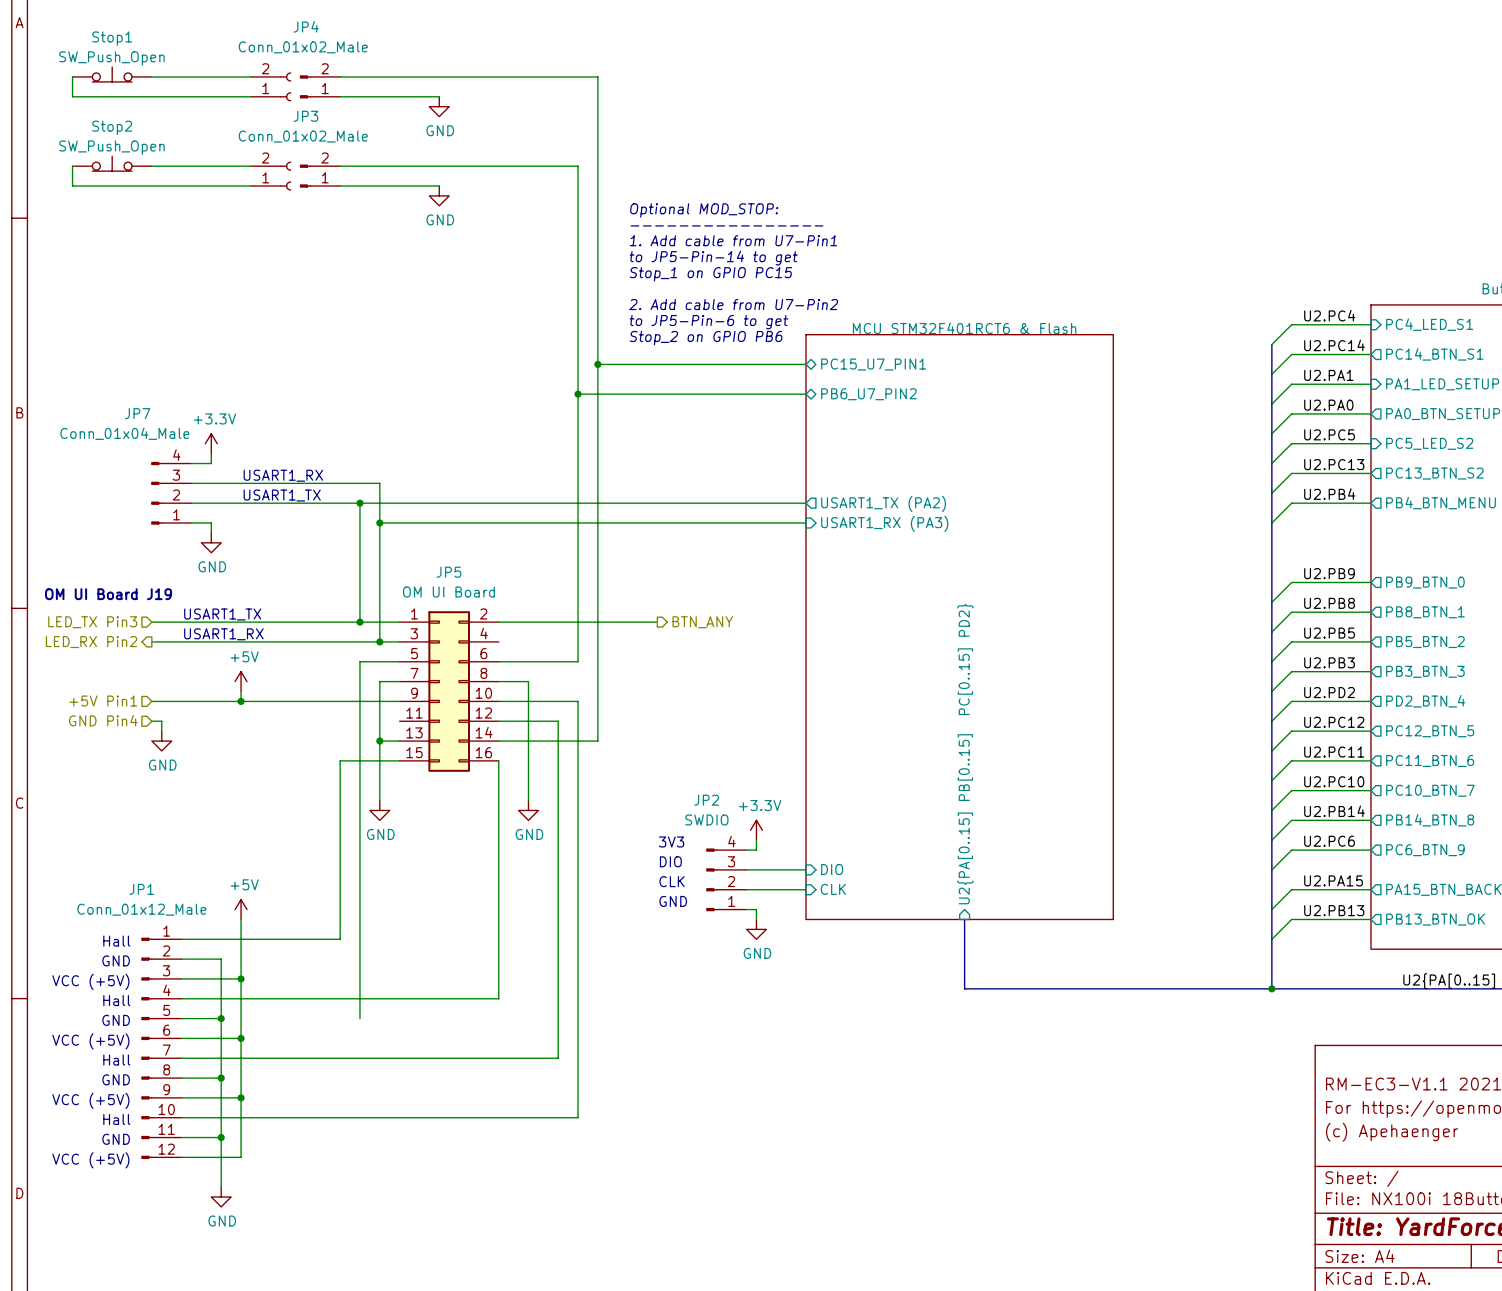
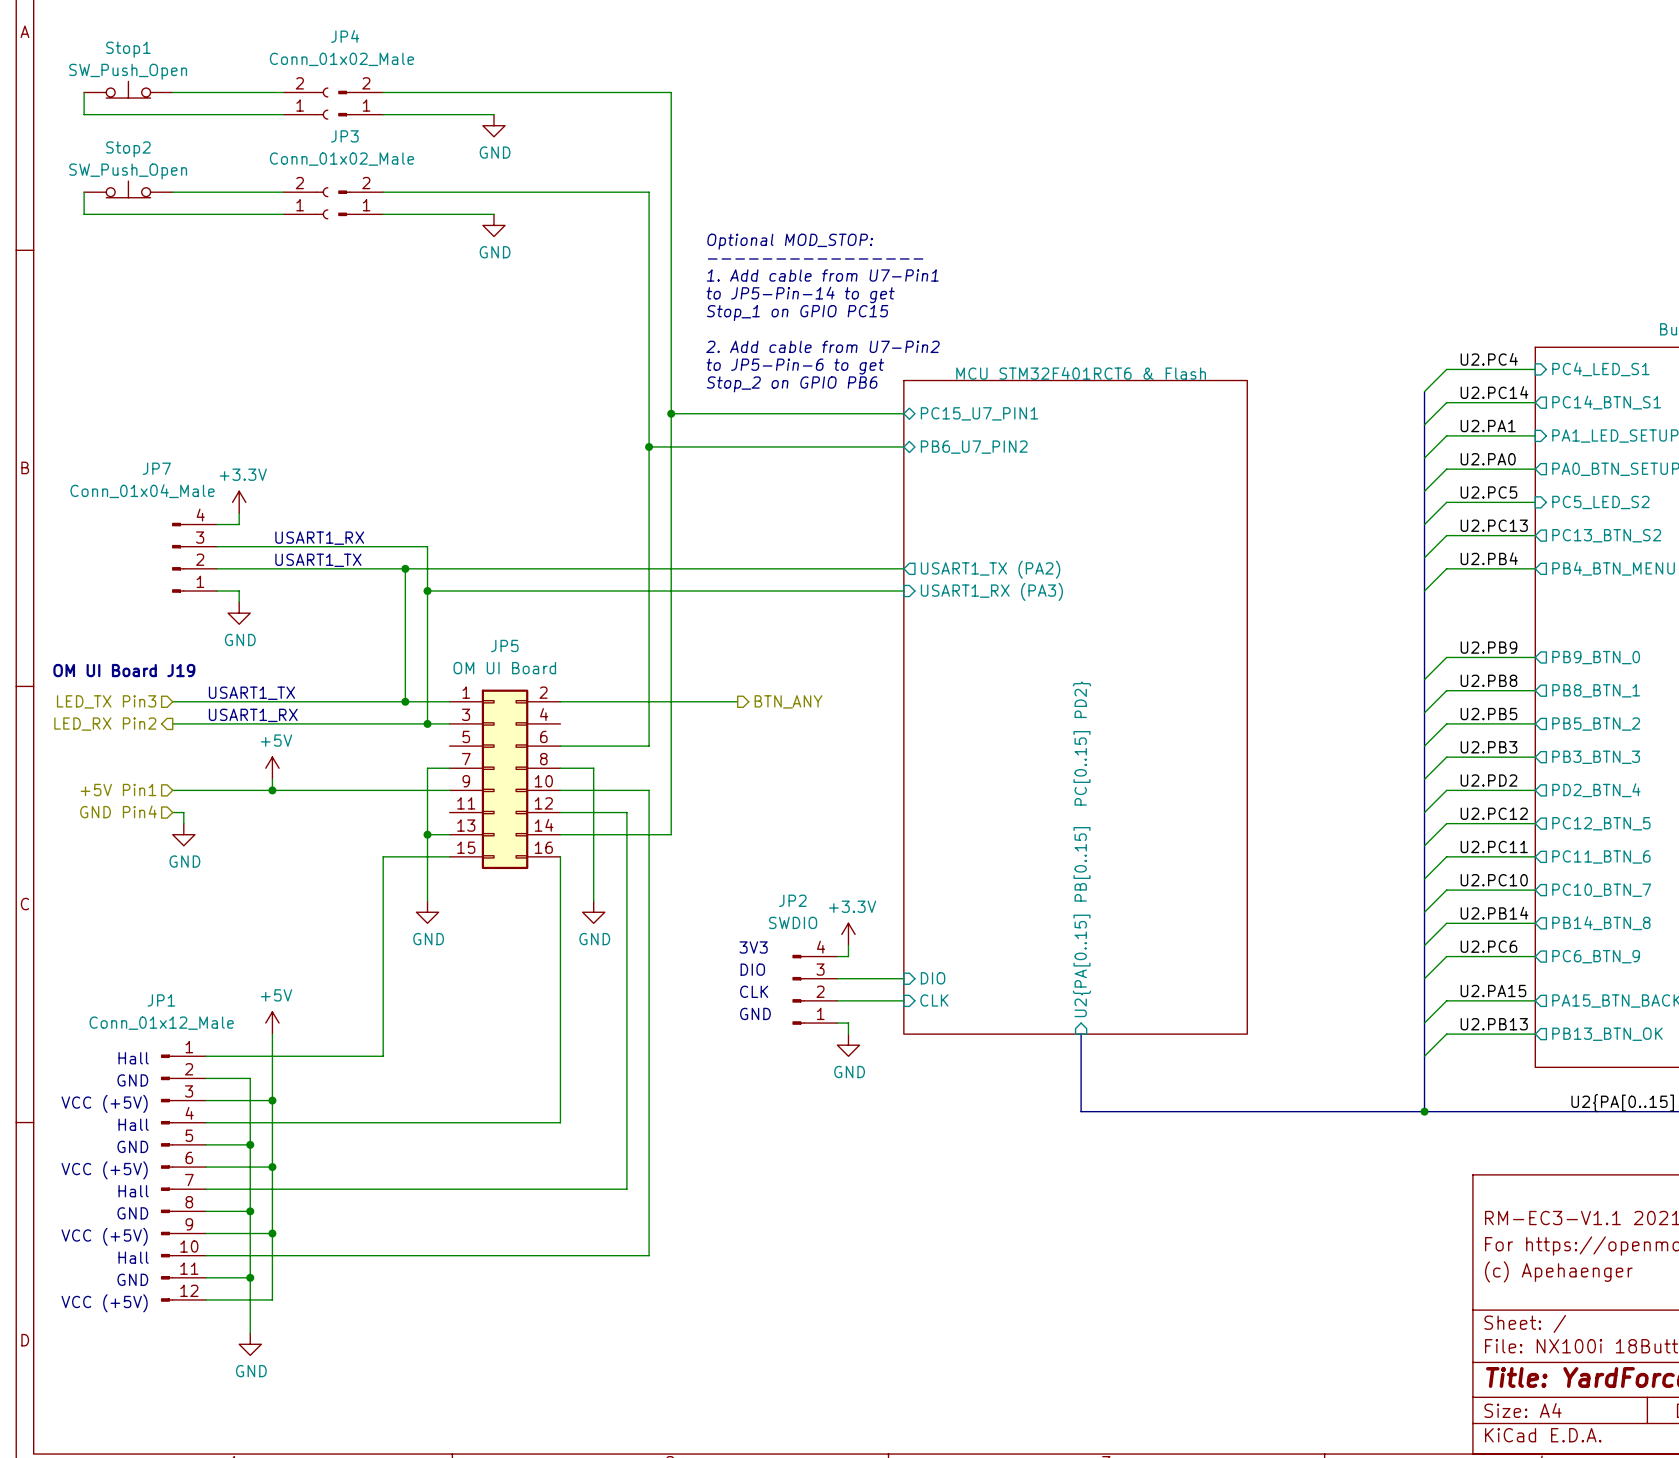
wire: (399, 661) (359, 661) (359, 1018) -> none

